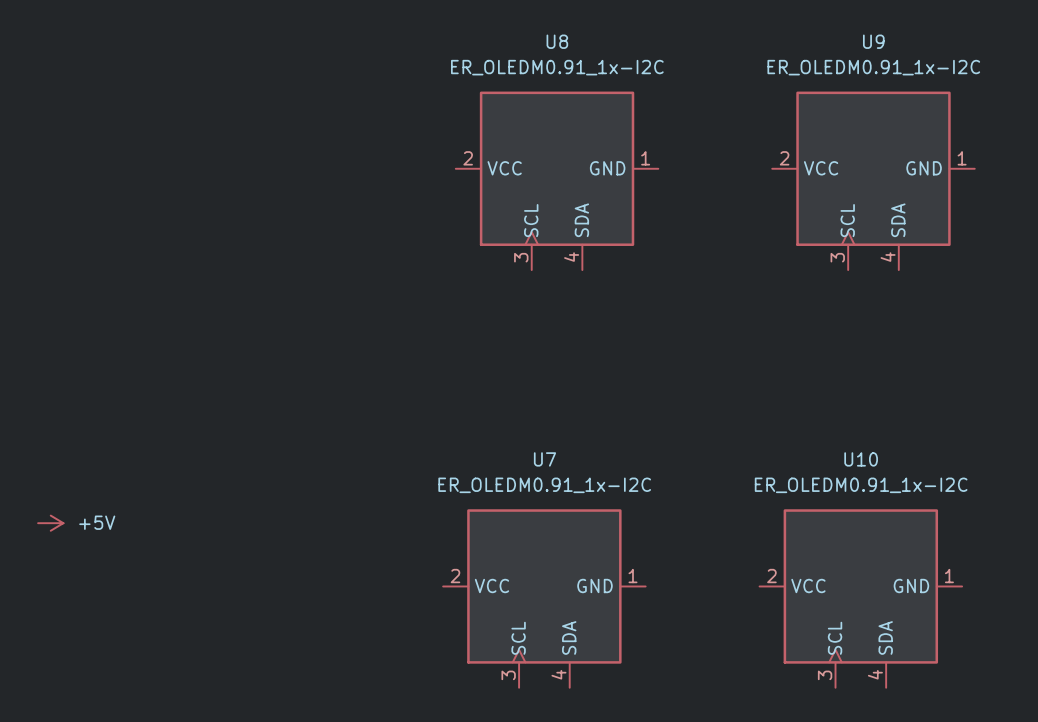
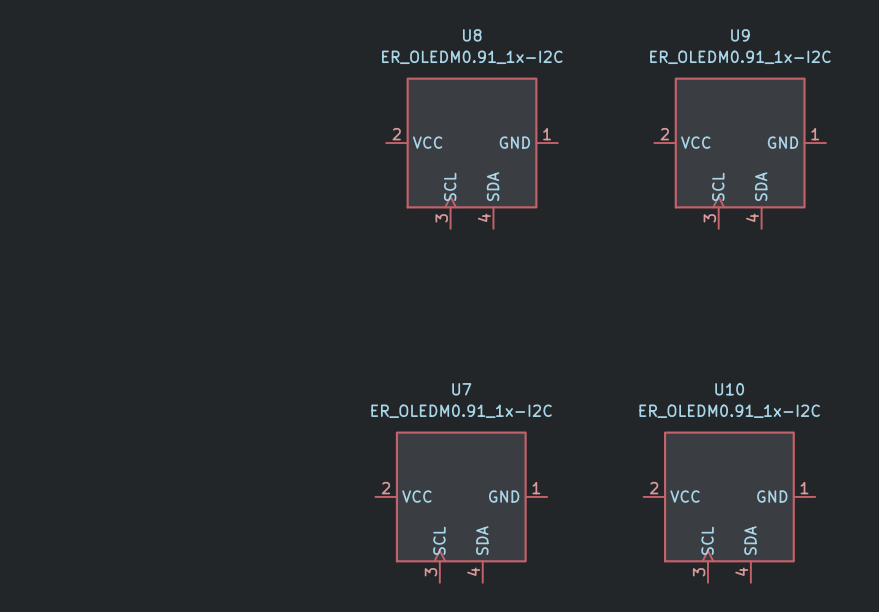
power symbol: +5V (50, 523) -> none

